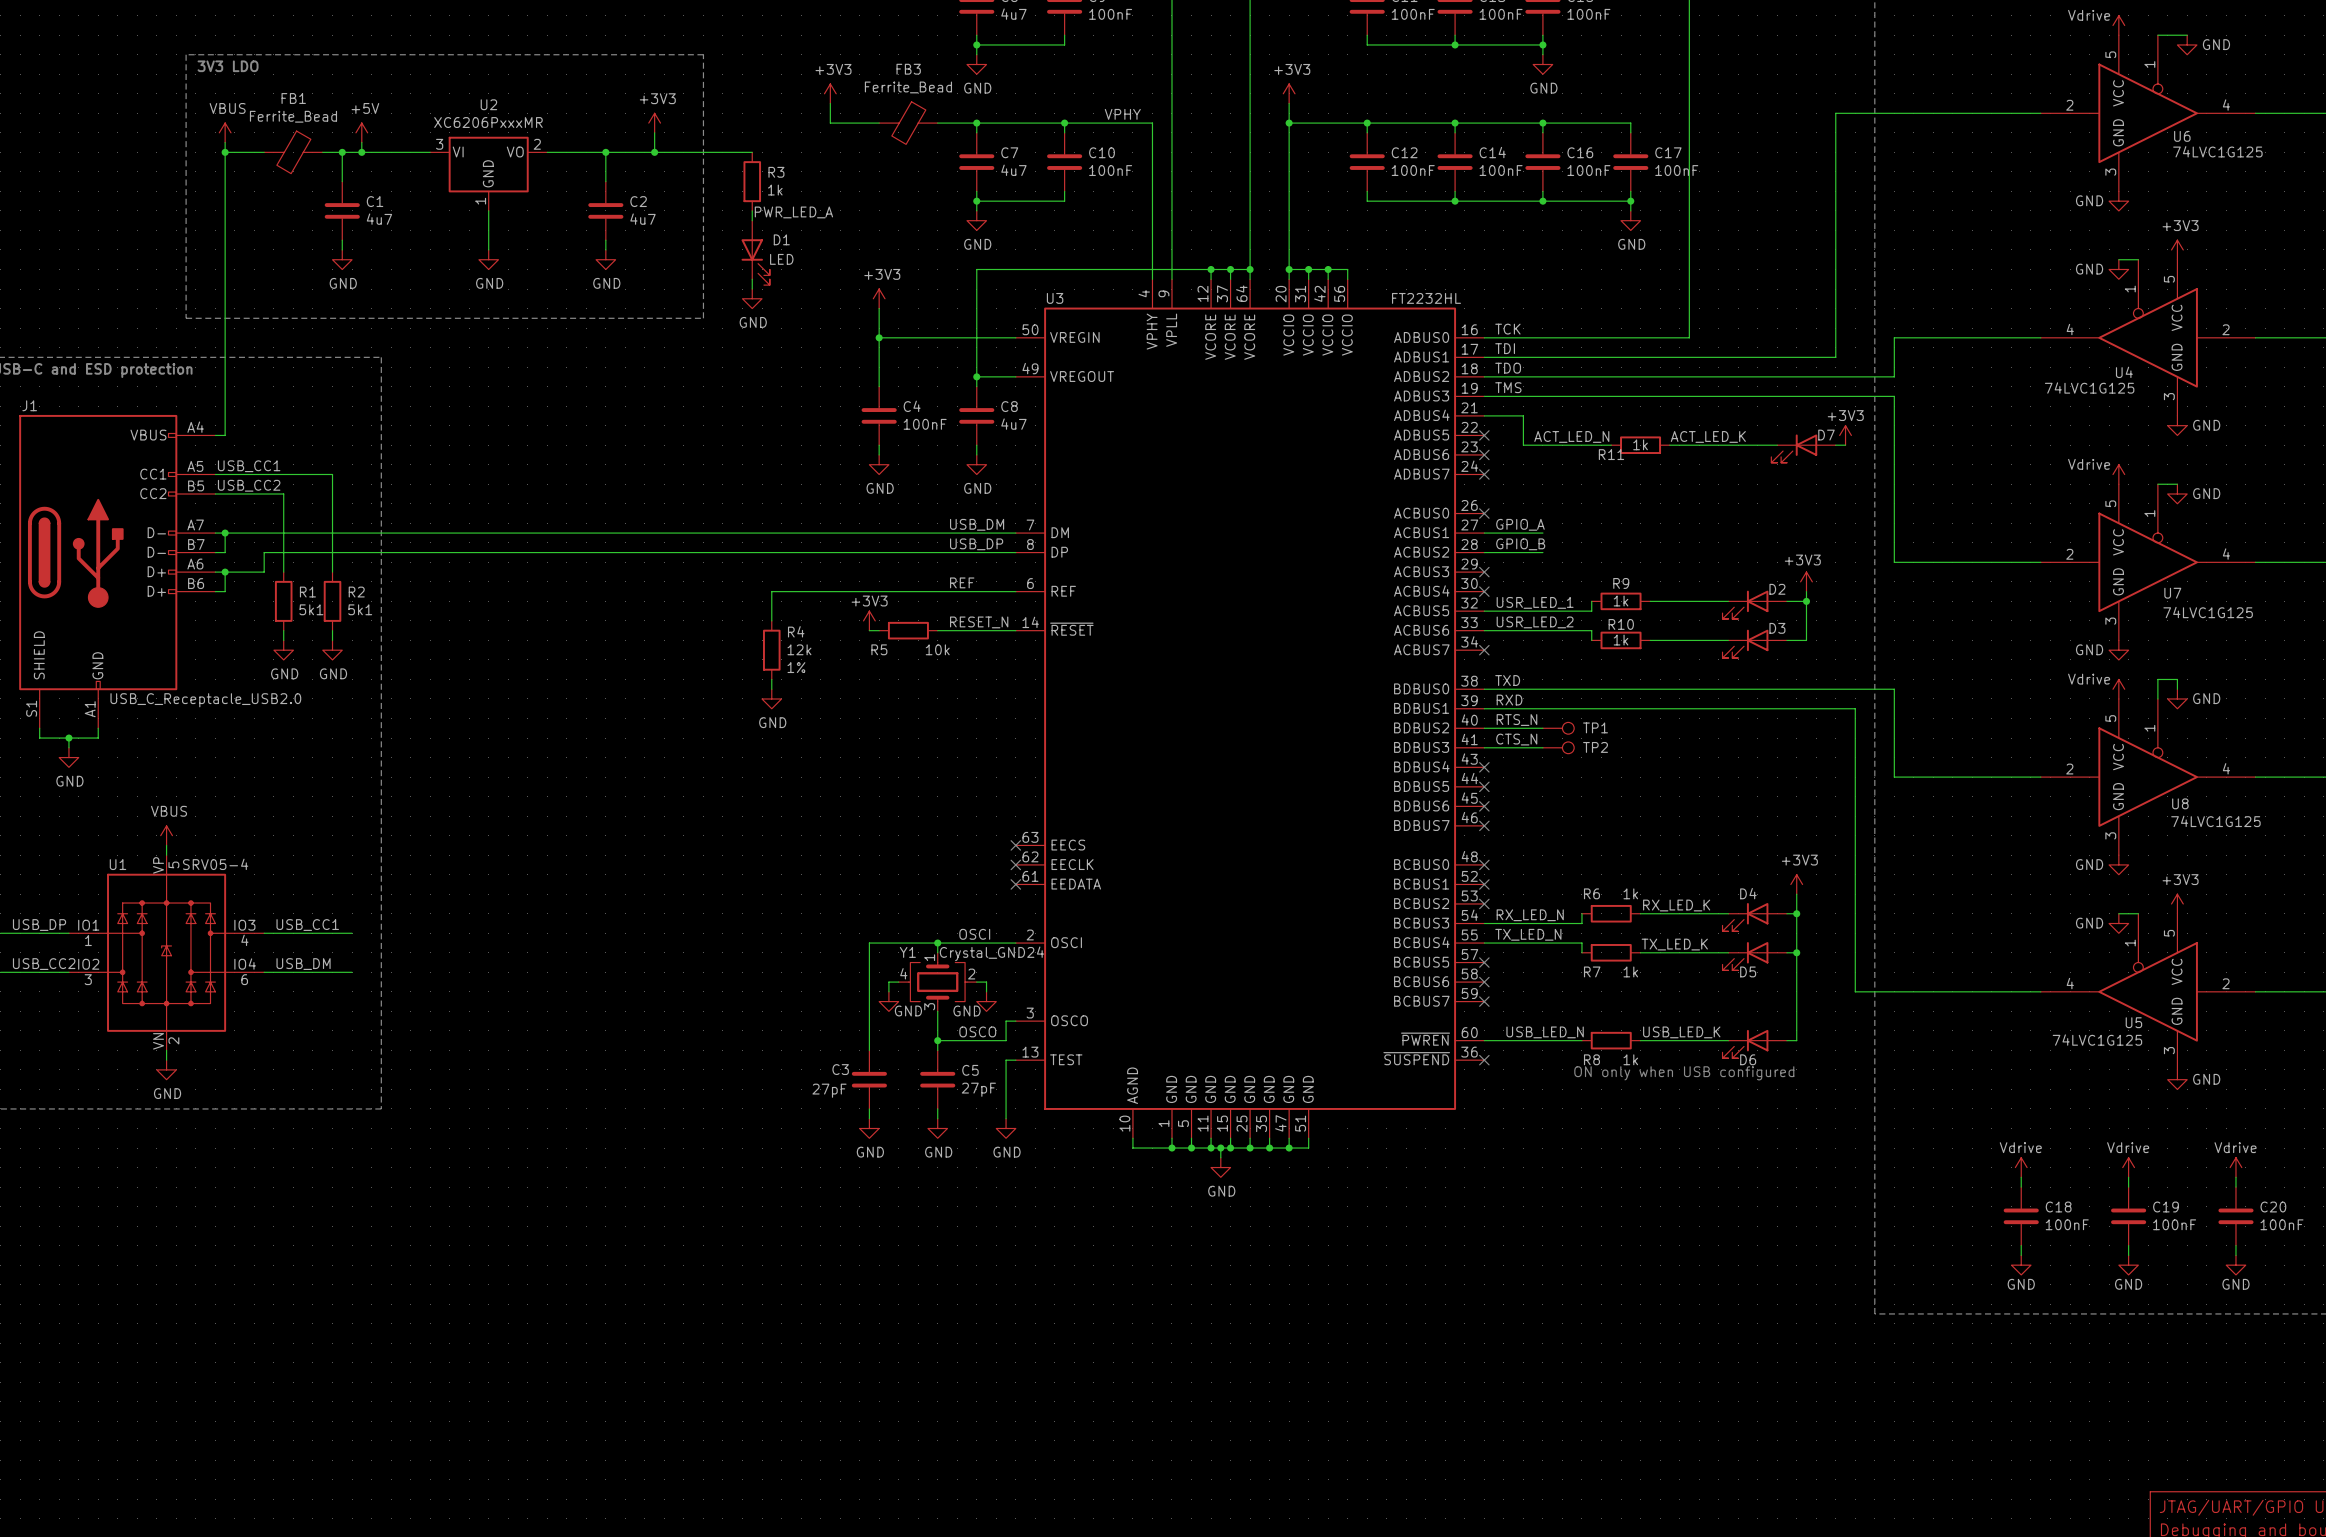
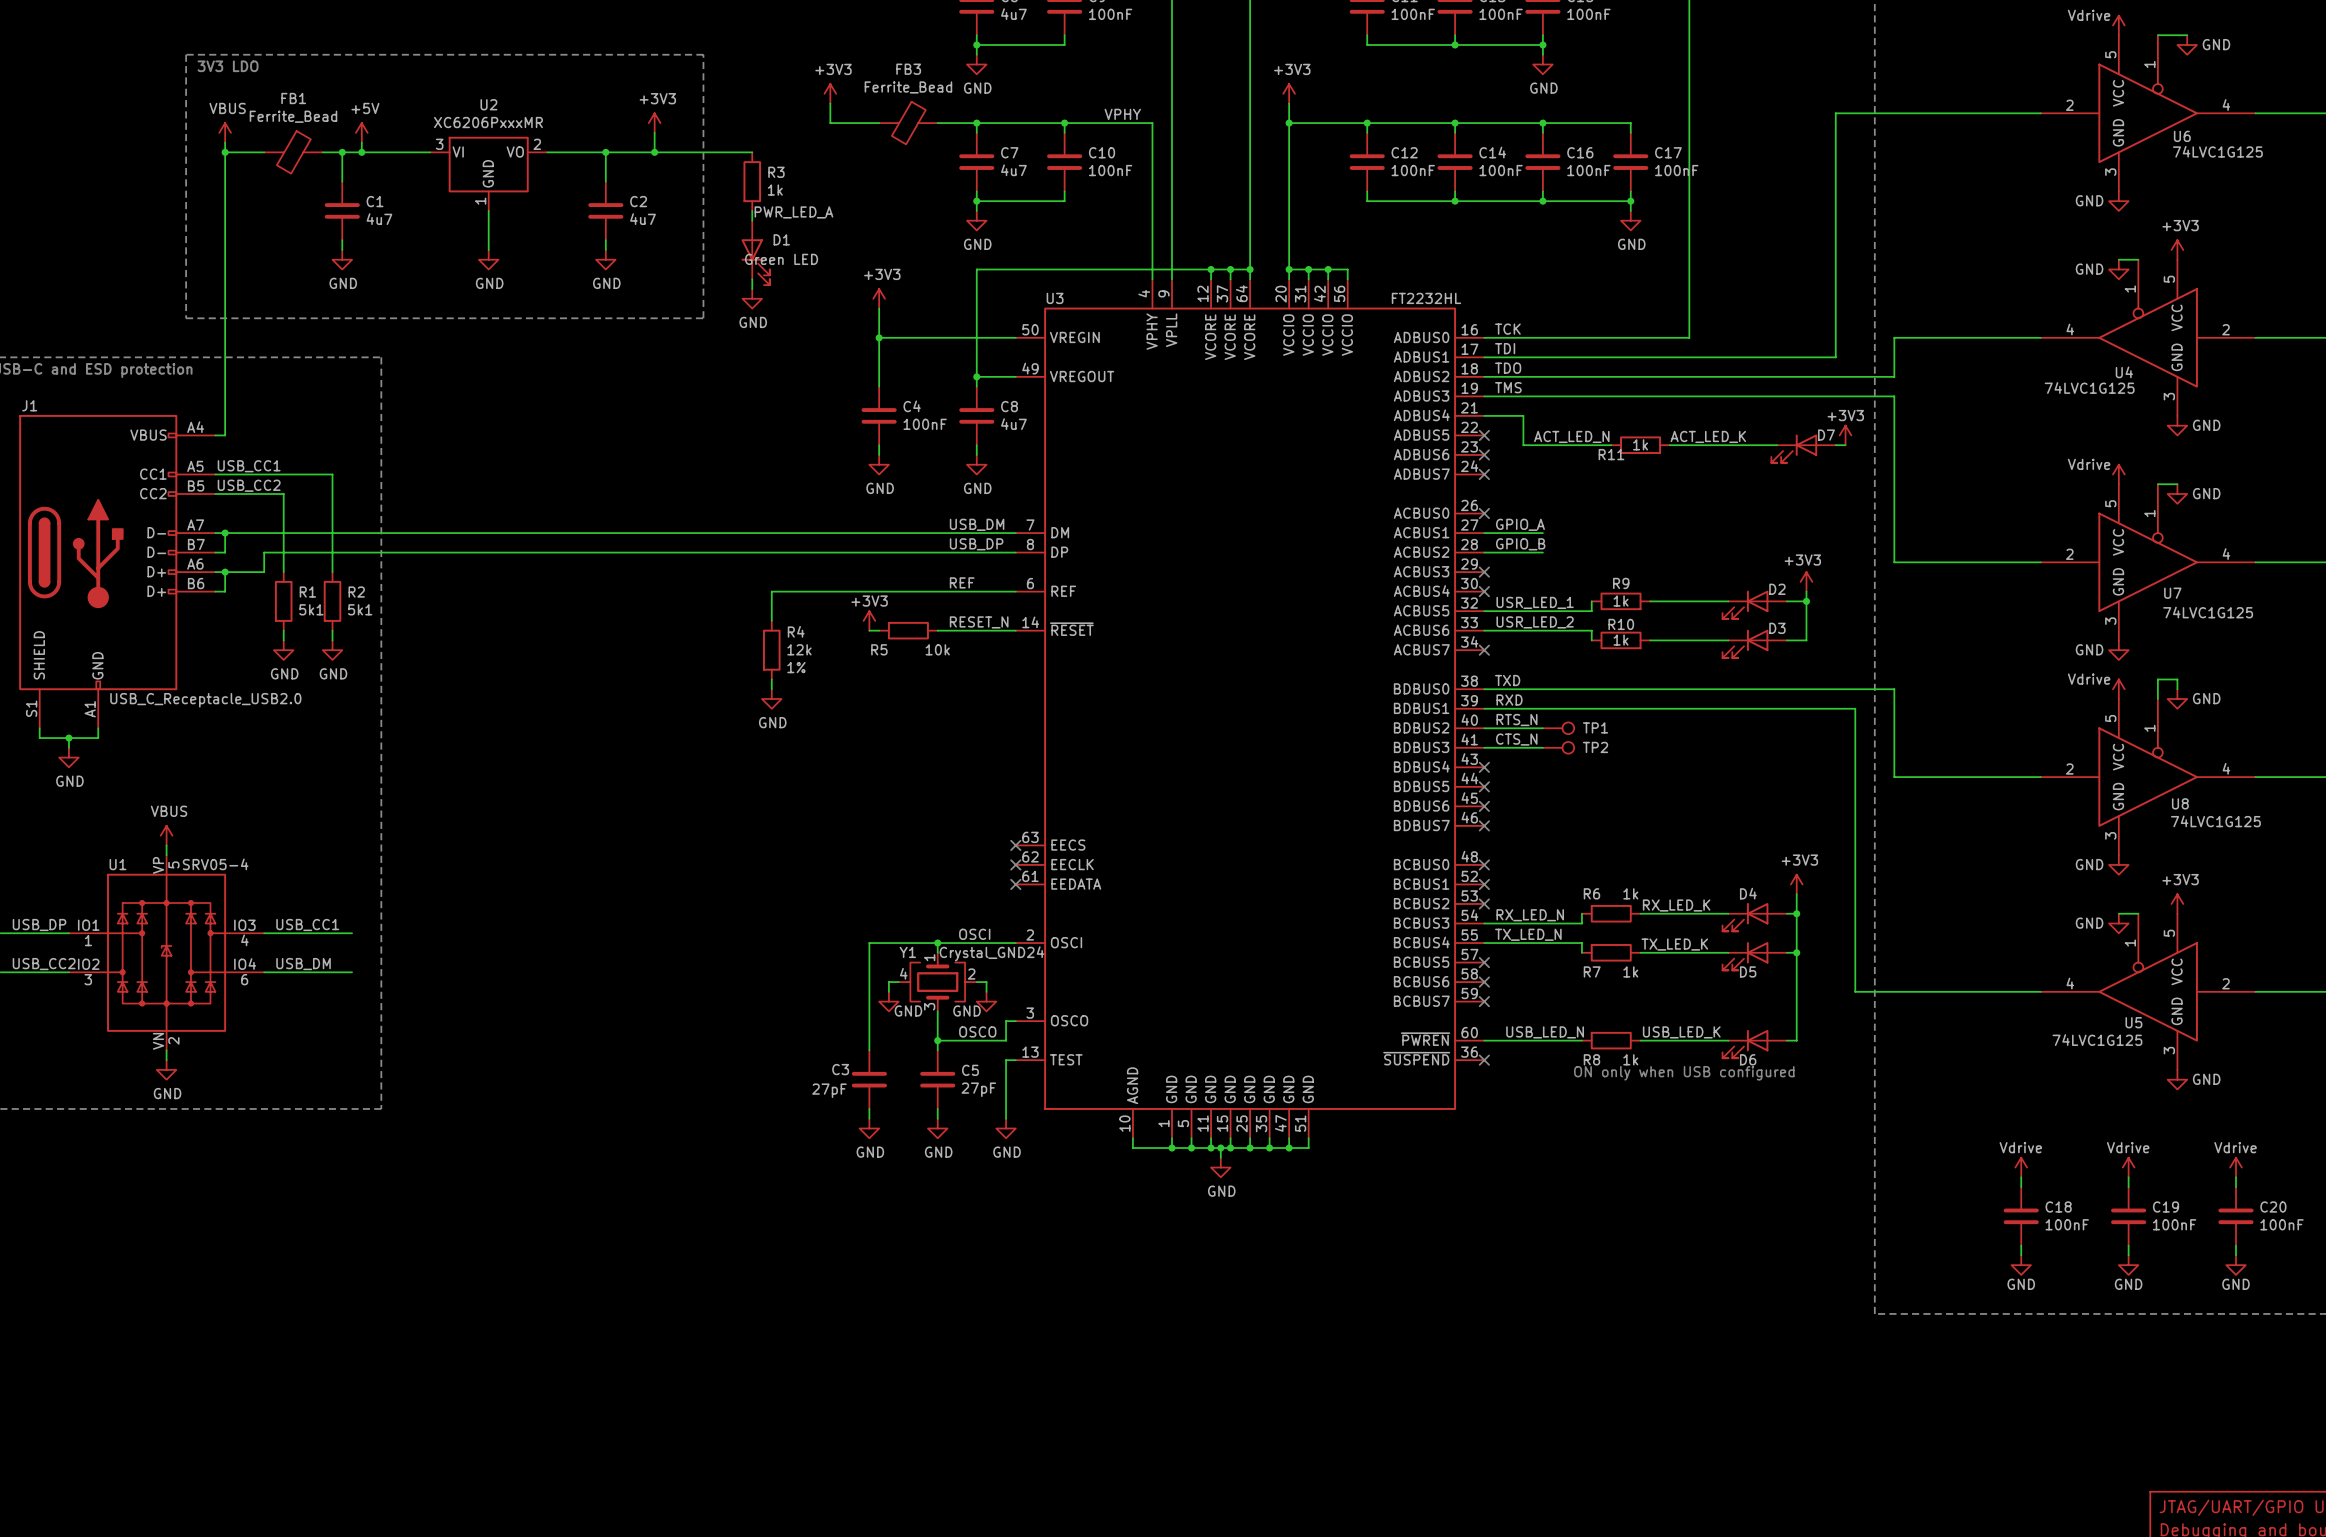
D1 value: LED (781, 259) -> Green LED (781, 259)

